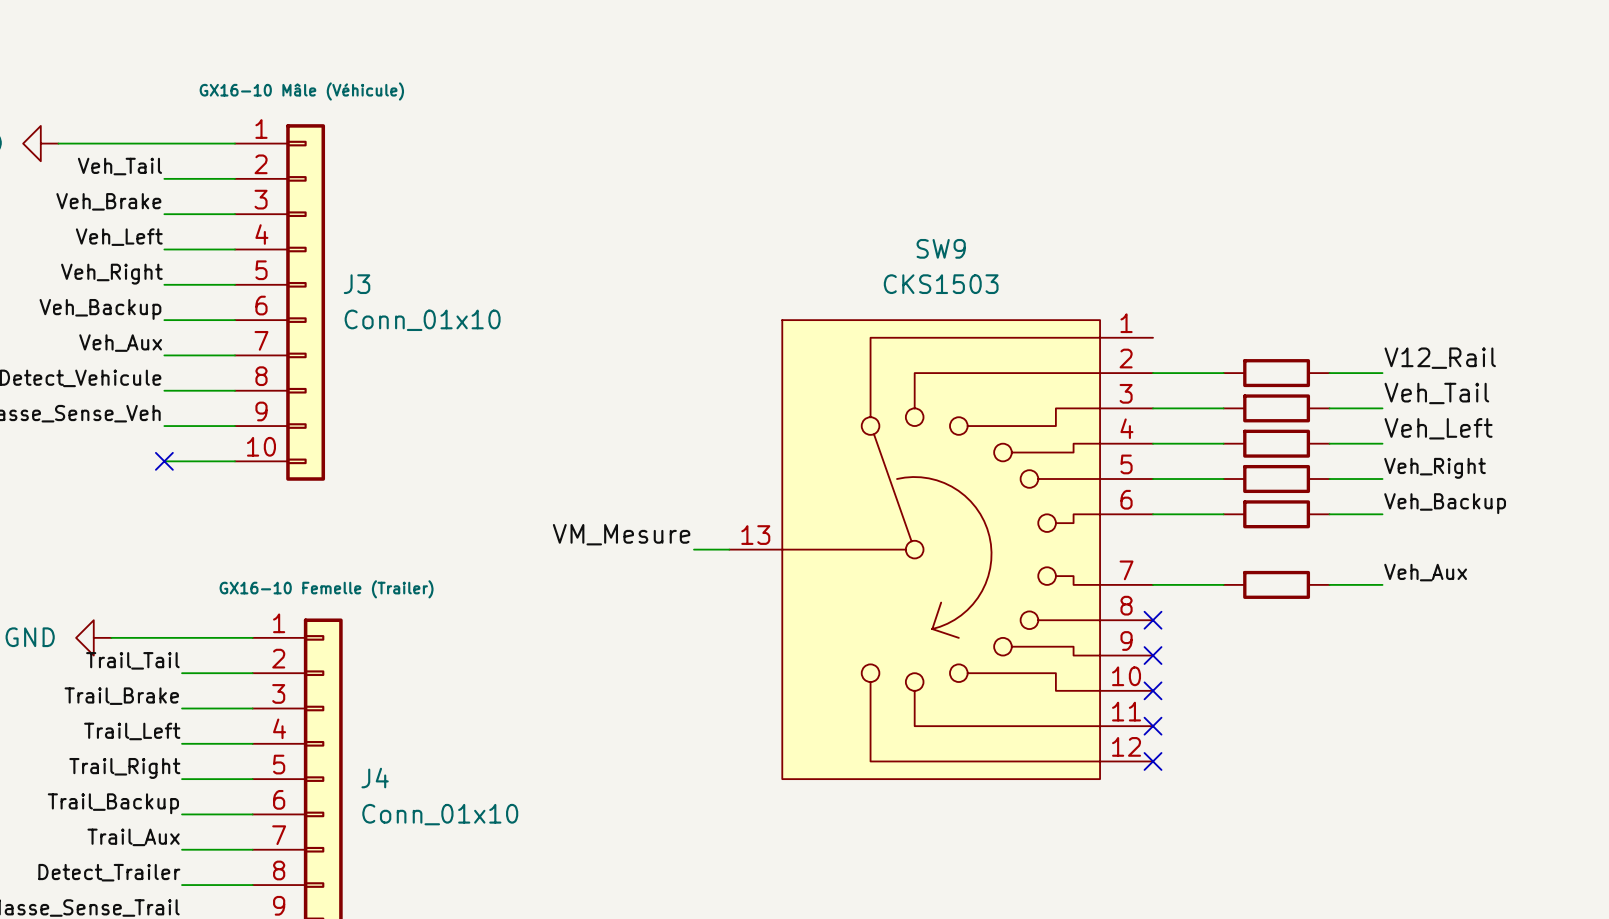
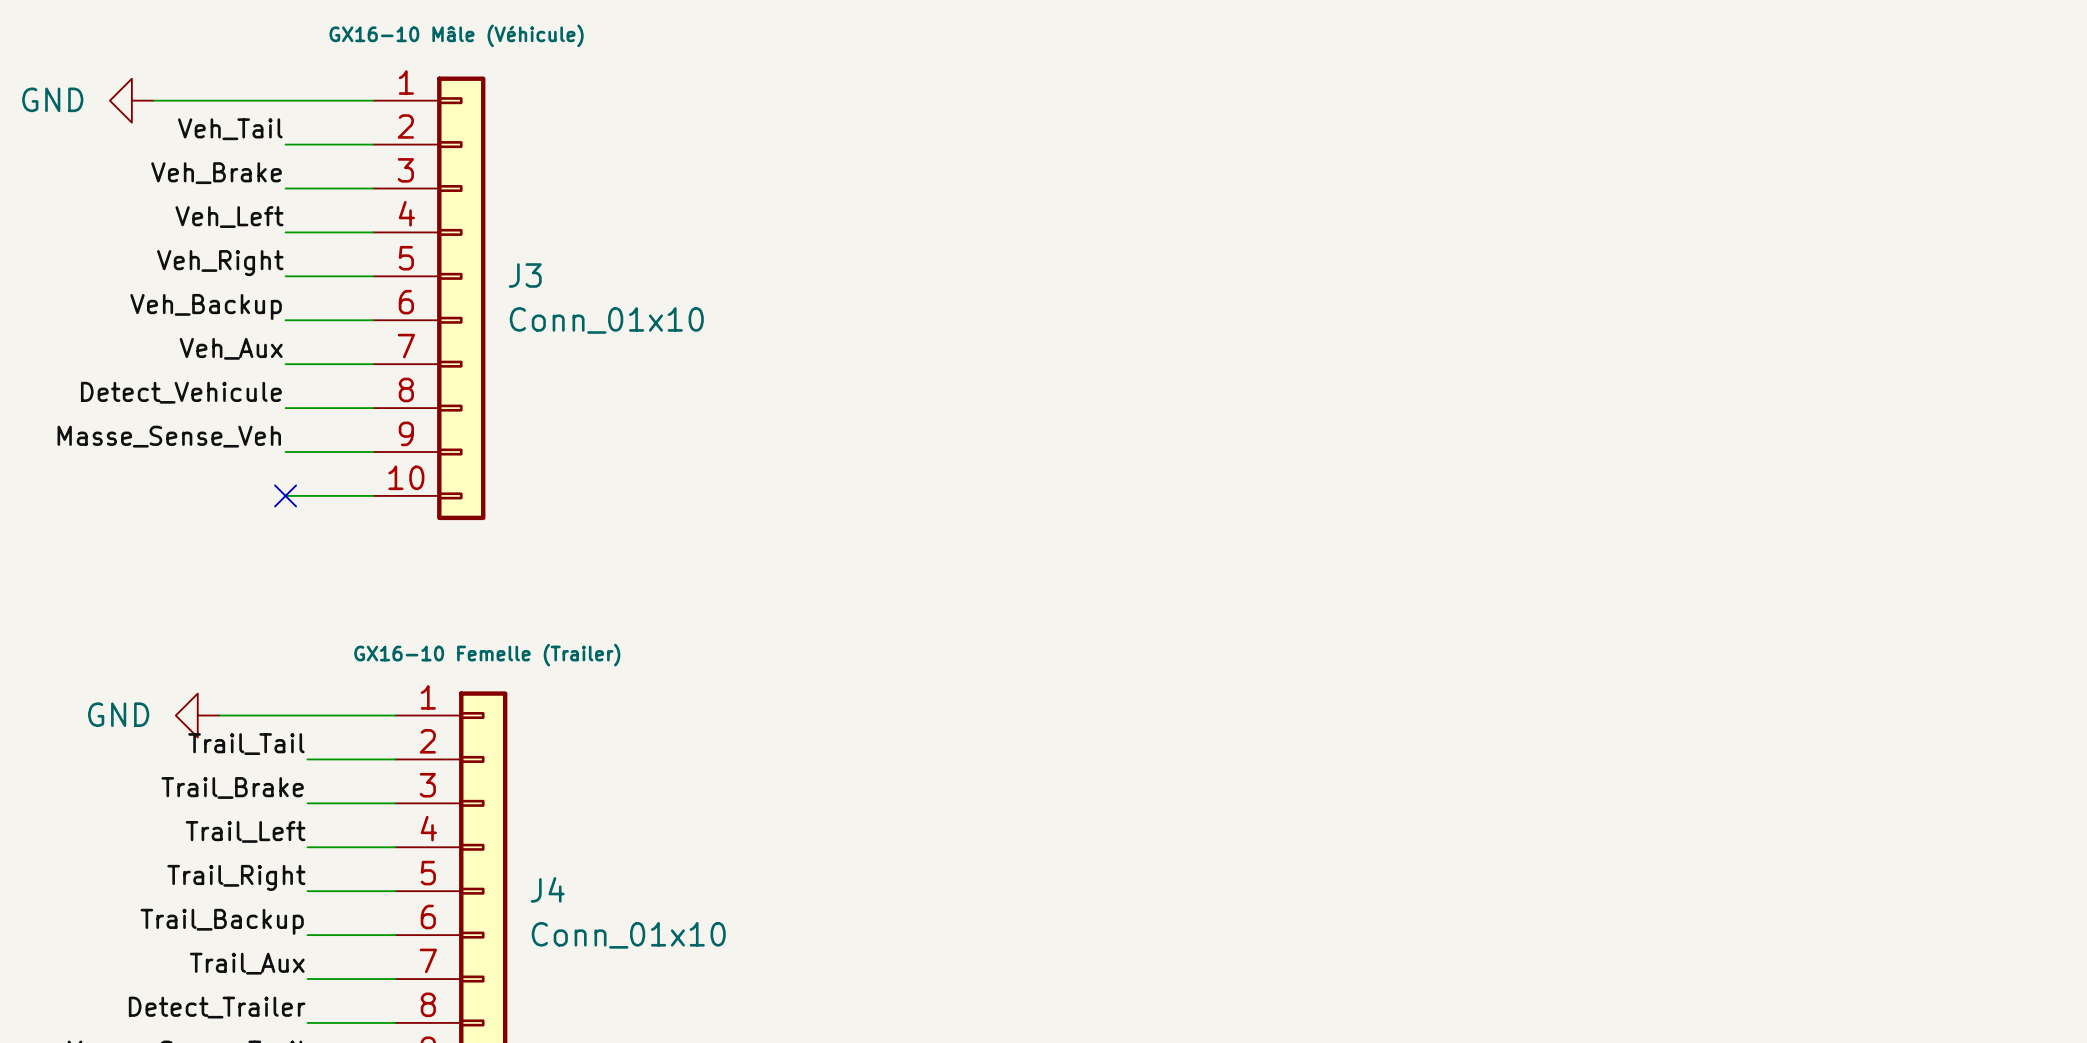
label: V12_Rail (1440, 358) -> none
wire: (1153, 373) (1223, 373) -> none
part: (1276, 373) -> none
wire: (1329, 373) (1382, 373) -> none
label: Veh_Tail (1436, 393) -> none
wire: (1153, 408) (1223, 408) -> none
part: (1276, 408) -> none
wire: (1329, 408) (1382, 408) -> none
label: Veh_Left (1438, 428) -> none
wire: (1153, 443) (1223, 443) -> none
part: (1276, 443) -> none
wire: (1329, 443) (1382, 443) -> none
label: Veh_Right (1435, 468) -> none
wire: (1153, 479) (1223, 479) -> none
part: (1276, 479) -> none
wire: (1329, 479) (1382, 479) -> none
label: Veh_Backup (1445, 503) -> none
wire: (1153, 514) (1223, 514) -> none
part: (1276, 514) -> none
wire: (1329, 514) (1382, 514) -> none
label: VM_Mesure (621, 534) -> none
wire: (694, 549) (729, 549) -> none
SW9: CKS1503 (941, 549) -> none
label: Veh_Aux (1425, 572) -> none
wire: (1153, 584) (1223, 584) -> none
part: (1276, 584) -> none
wire: (1329, 584) (1382, 584) -> none
no-connect mark: (1153, 620) -> none
no-connect mark: (1153, 655) -> none
no-connect mark: (1153, 690) -> none
no-connect mark: (1153, 726) -> none
no-connect mark: (1153, 761) -> none

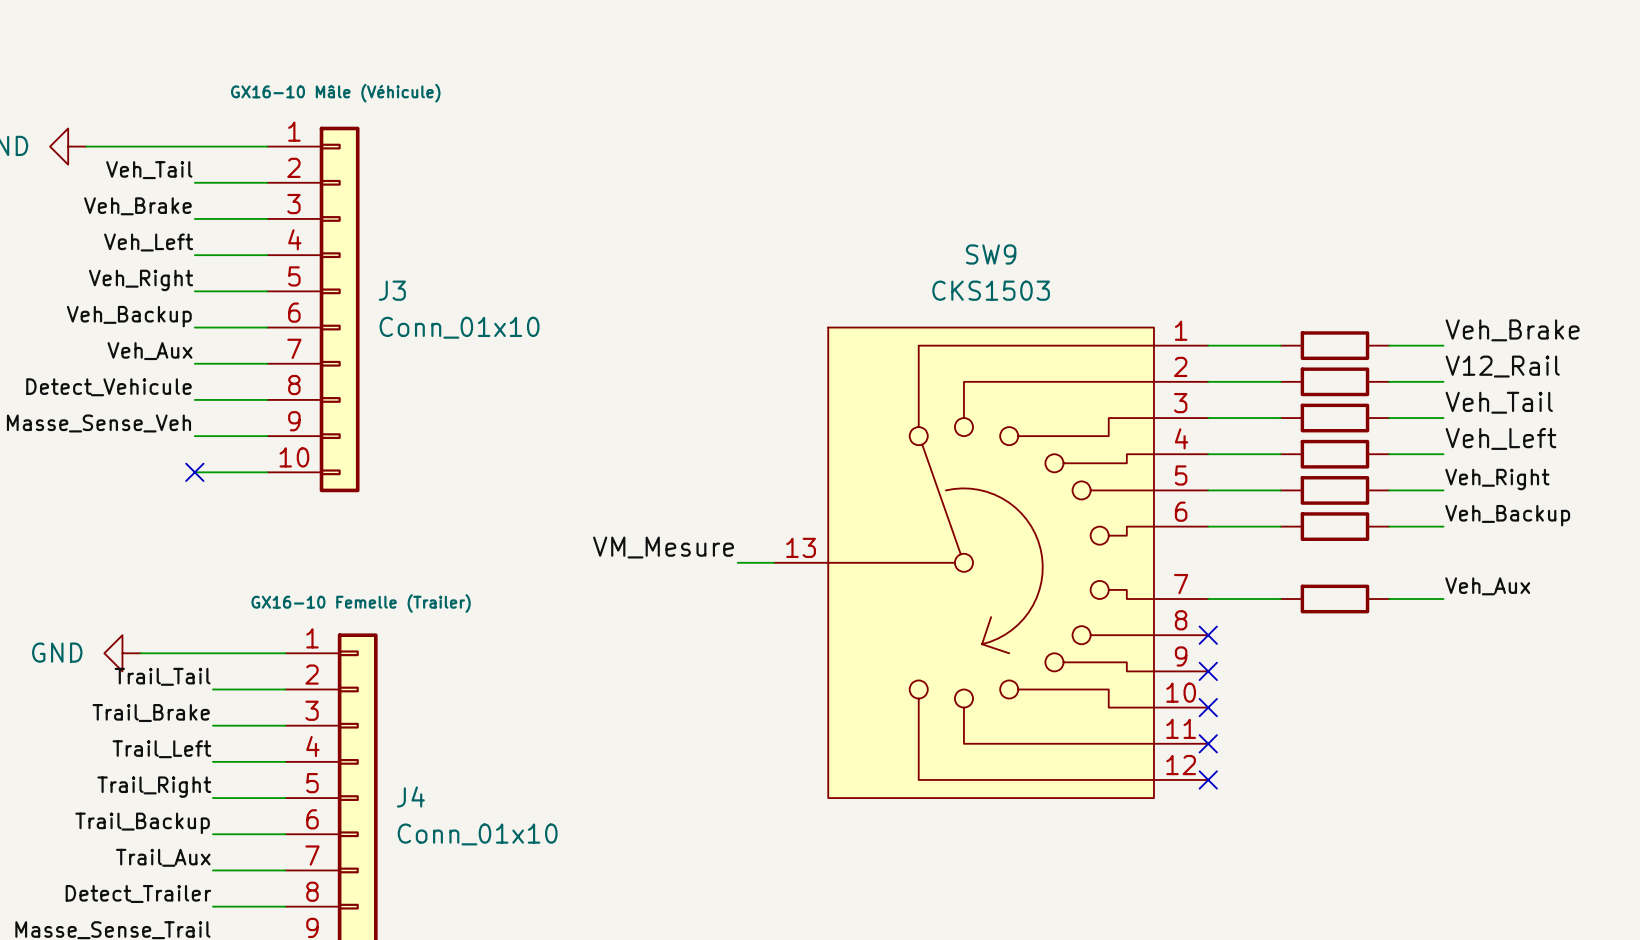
label: none -> Veh_Brake (1512, 330)
wire: none -> (1208, 345) (1280, 345)
part: none -> (1334, 345)
wire: none -> (1389, 345) (1443, 345)
label: none -> V12_Rail (1502, 366)
wire: none -> (1208, 381) (1280, 381)
part: none -> (1334, 381)
wire: none -> (1389, 381) (1443, 381)
label: none -> Veh_Tail (1499, 402)
wire: none -> (1208, 418) (1280, 418)
part: none -> (1334, 418)
wire: none -> (1389, 418) (1443, 418)
label: none -> Veh_Left (1500, 438)
wire: none -> (1208, 454) (1280, 454)
part: none -> (1334, 454)
wire: none -> (1389, 454) (1443, 454)
label: none -> Veh_Right (1497, 479)
wire: none -> (1208, 490) (1280, 490)
part: none -> (1334, 490)
wire: none -> (1389, 490) (1443, 490)
label: none -> Veh_Backup (1507, 515)
wire: none -> (1208, 526) (1280, 526)
part: none -> (1334, 526)
wire: none -> (1389, 526) (1443, 526)
label: none -> VM_Mesure (663, 547)
wire: none -> (737, 562) (773, 562)
SW9: none -> CKS1503 (991, 562)
label: none -> Veh_Aux (1487, 586)
wire: none -> (1208, 599) (1280, 599)
part: none -> (1334, 599)
wire: none -> (1389, 599) (1443, 599)
no-connect mark: none -> (1208, 635)
no-connect mark: none -> (1208, 671)
no-connect mark: none -> (1208, 707)
no-connect mark: none -> (1208, 743)
no-connect mark: none -> (1208, 779)

